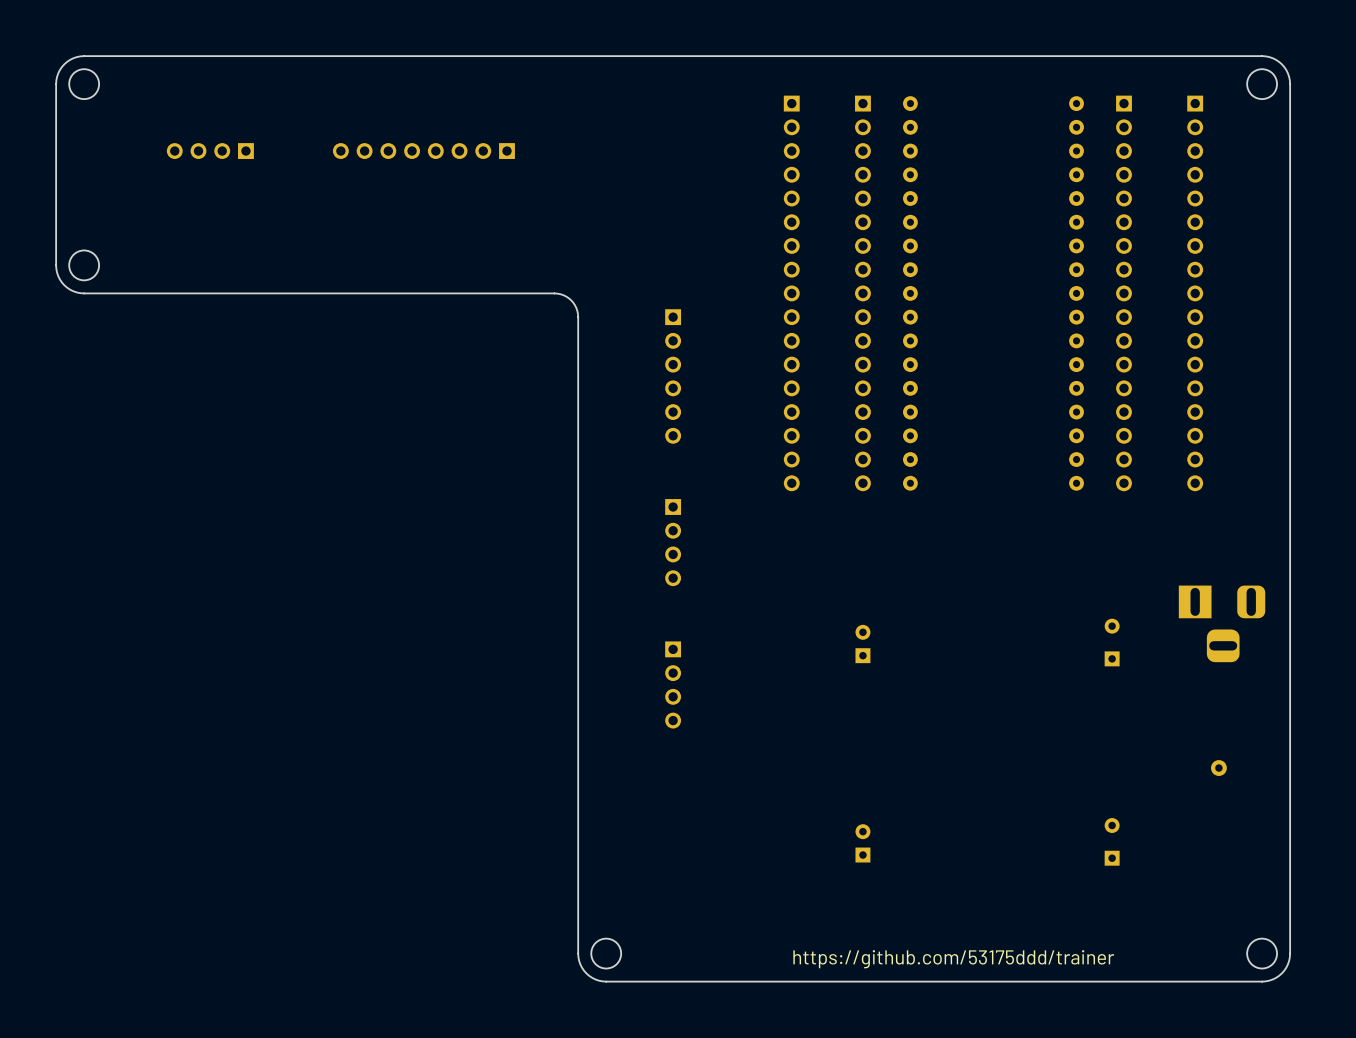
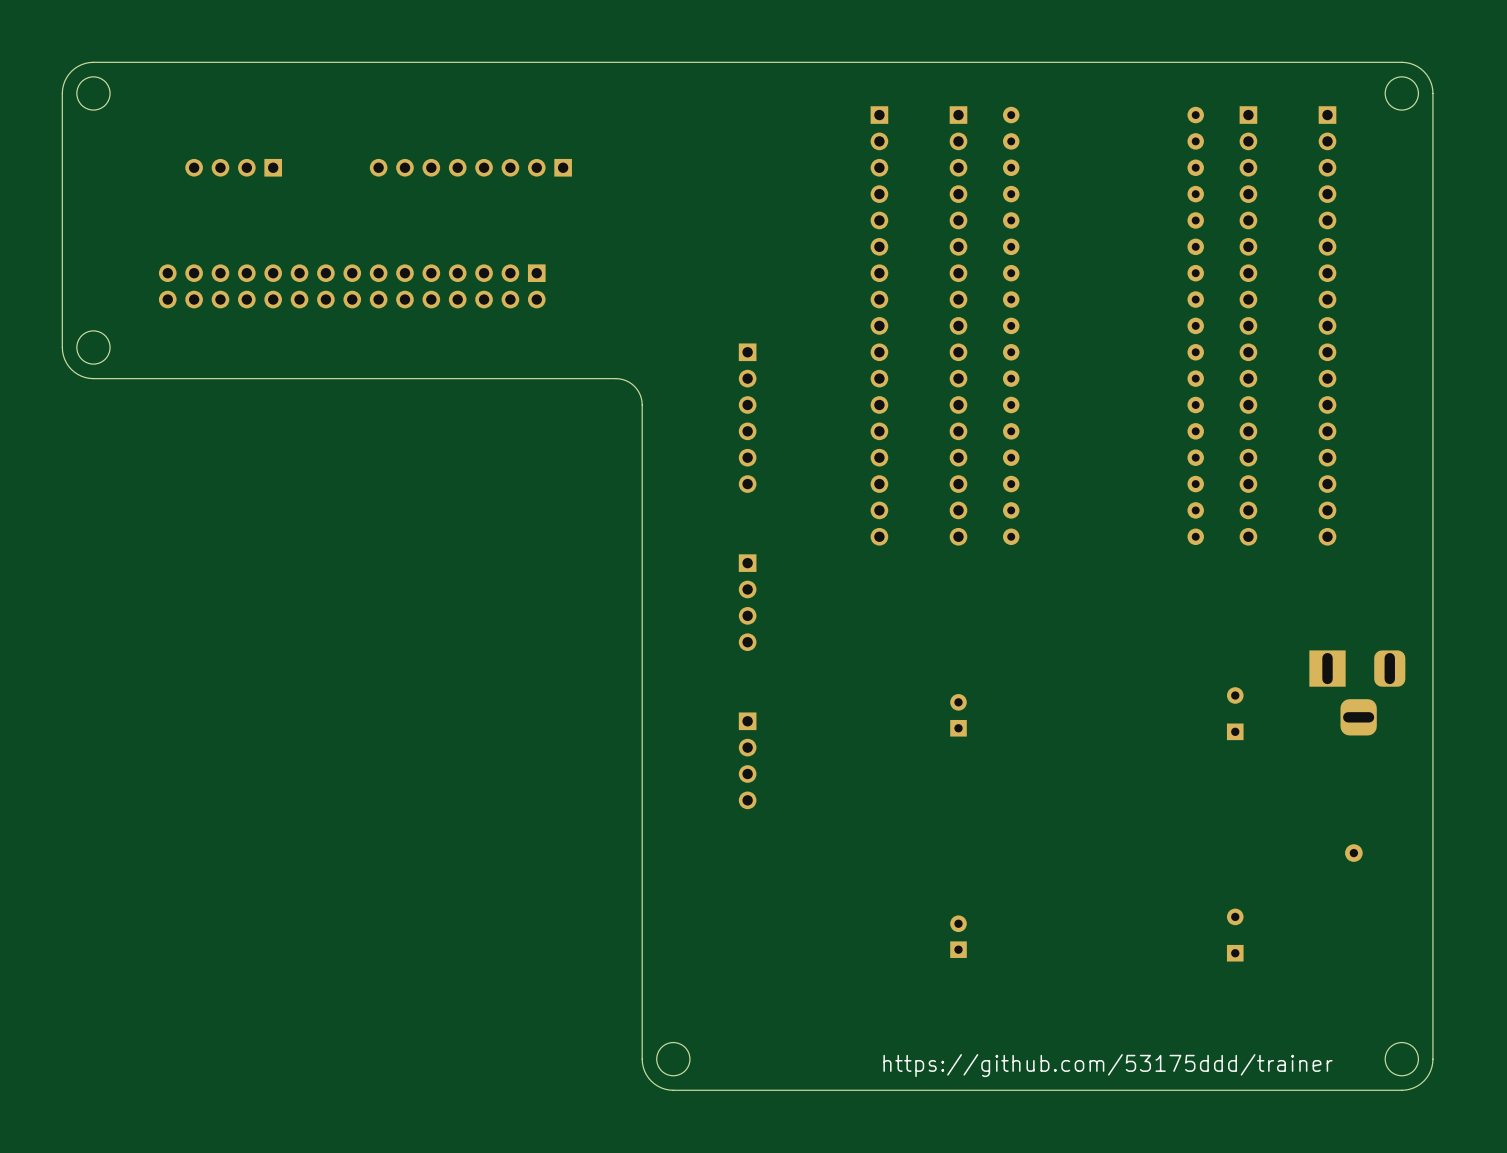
part: none -> (352, 286)
board edge: (56, 265) (58, 276) (64, 285) (73, 291) (84, 293) (557, 293) (568, 298) (577, 311) (578, 364) -> (62, 294) (63, 355) (66, 363) (74, 372) (89, 378) (615, 378) (625, 380) (634, 386) (640, 394) (642, 404)
round board edge position: (84, 265) -> (93, 347)

